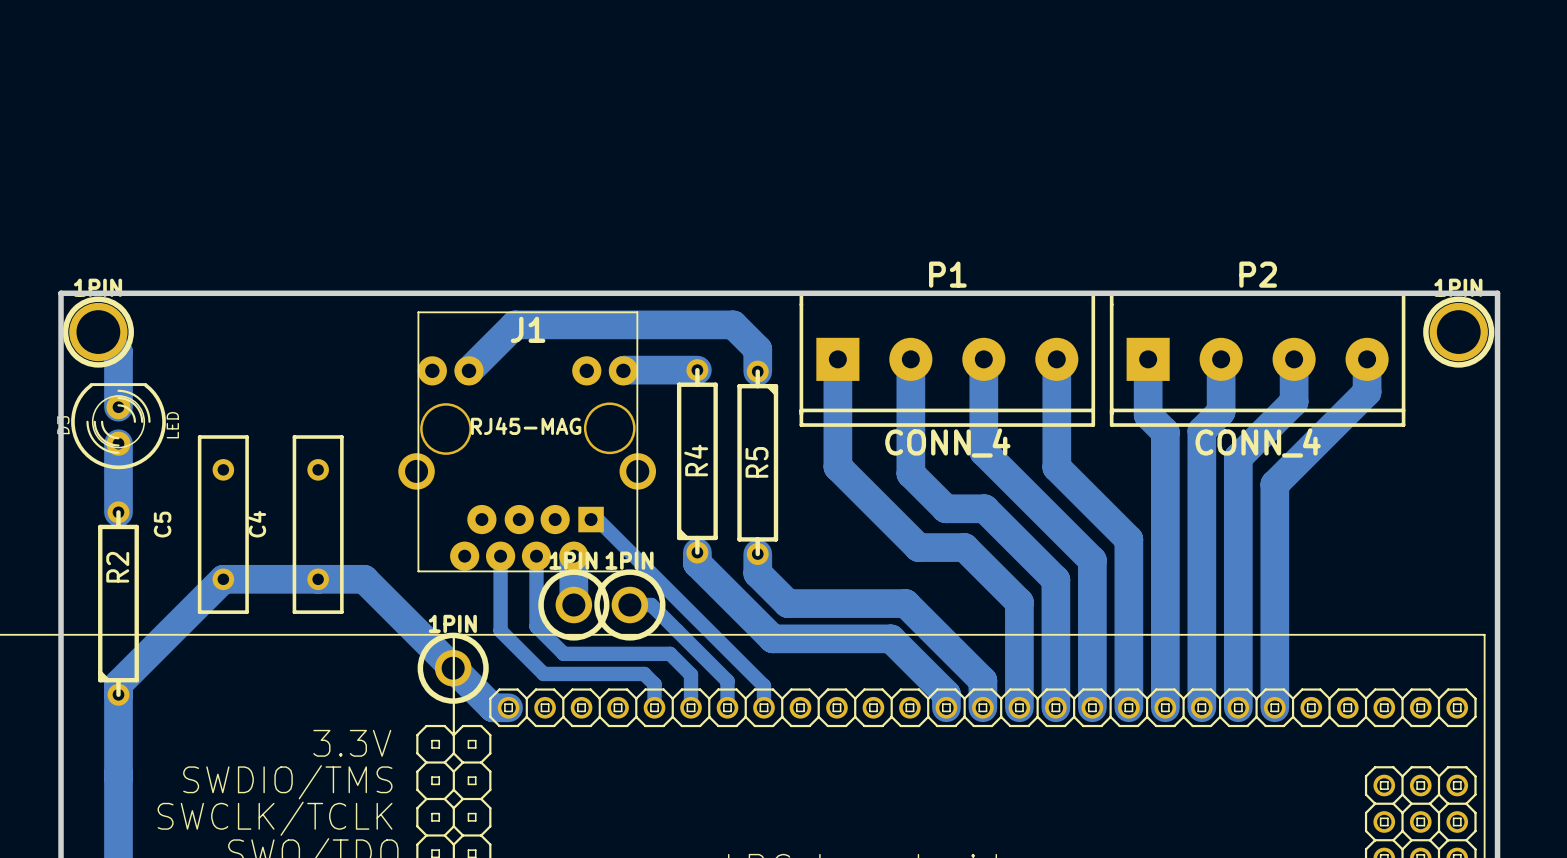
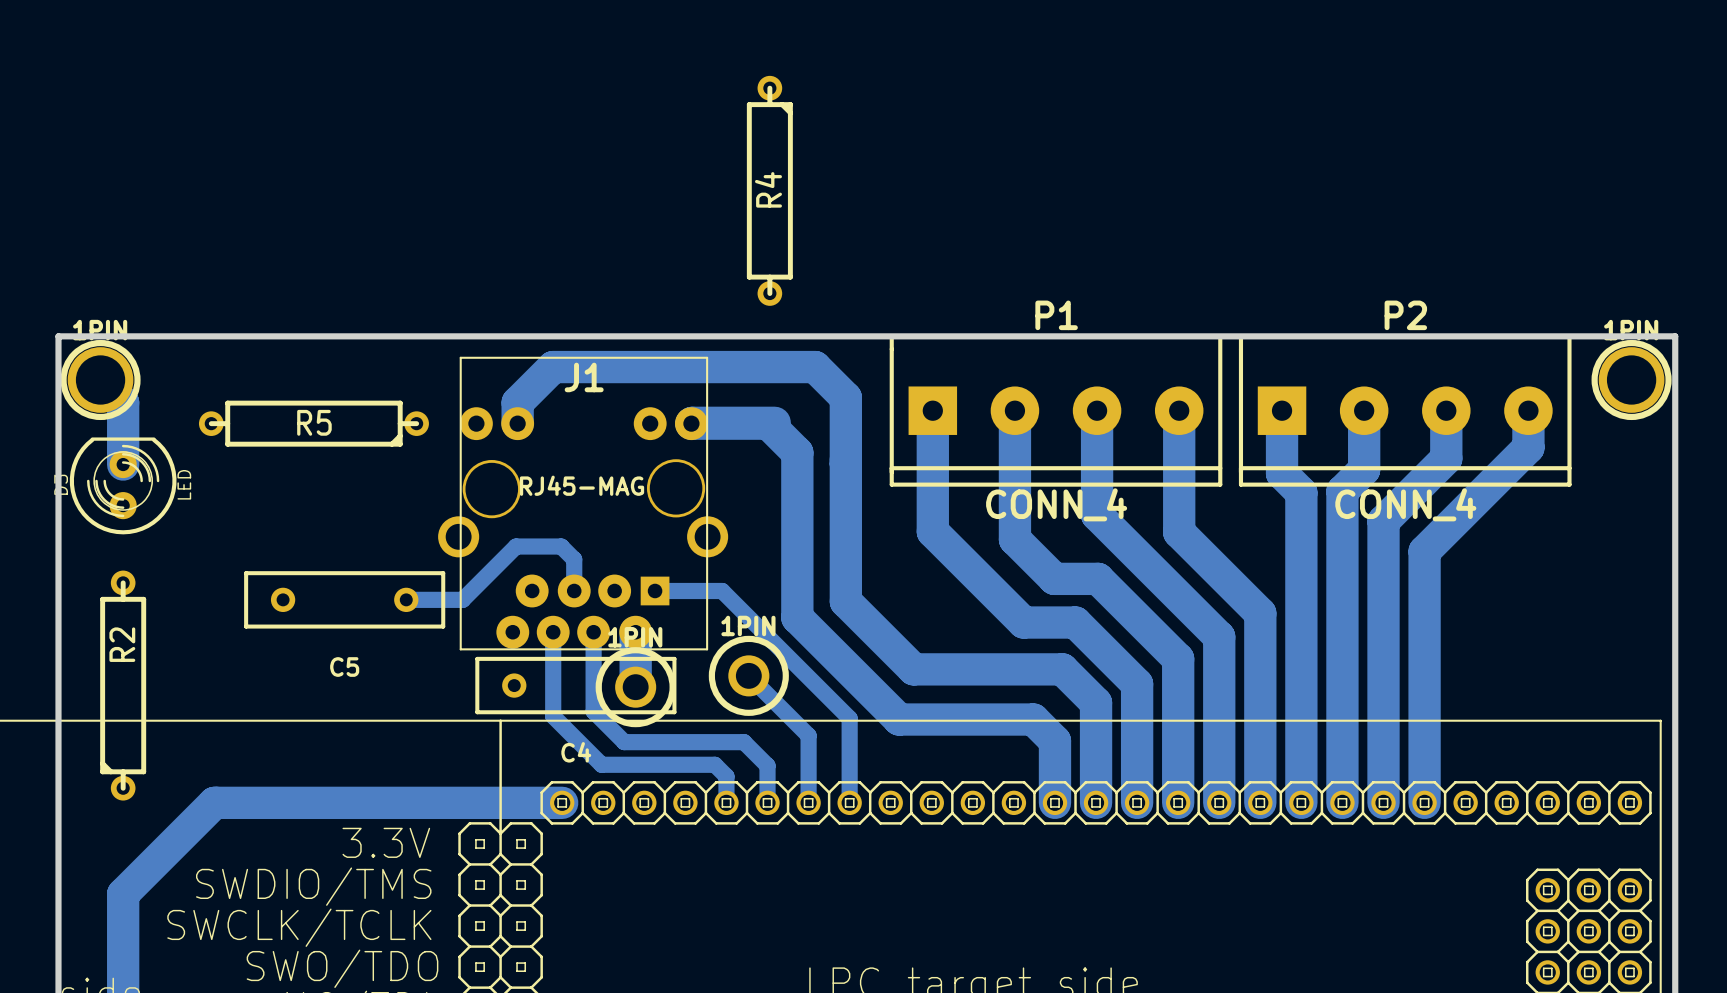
bottom track: (468, 370) (514, 324) (733, 324) (757, 349) (757, 371) -> none
bottom track: (118, 443) (118, 512) -> none
R4 rotation: 0° (697, 461) -> 180° (769, 190)
R4 position: (697, 461) -> (769, 190)
R5 rotation: 0° (757, 462) -> 90° clockwise (313, 423)
R5 position: (757, 462) -> (313, 423)
bottom track: none -> (574, 590) (574, 559) (561, 546) (516, 546) (462, 599) (406, 599)
bottom track: (597, 519) (763, 685) -> (662, 590) (722, 590) (849, 718) (849, 778)
C5 name position: C5 (162, 524) -> C5 (344, 667)
C5 rotation: 0° (223, 524) -> 90° clockwise (344, 599)
C4 name position: C4 (257, 524) -> C4 (576, 752)
C4 rotation: 0° (318, 524) -> 90° clockwise (575, 685)
C4 position: (318, 524) -> (575, 685)
bottom track: (697, 552) (697, 563) (772, 638) (891, 638) (946, 694) -> (691, 423) (768, 423) (797, 452) (797, 617) (899, 719) (1033, 719) (1054, 741) (1054, 787)
bottom track: (757, 554) (757, 573) (787, 603) (905, 603) (982, 680) -> (517, 423) (517, 402) (553, 367) (815, 367) (845, 397) (845, 601) (913, 669) (1062, 669) (1096, 702) (1096, 772)
bottom track: (629, 604) (651, 604) (727, 681) -> (748, 675) (808, 735) (808, 772)
1PIN position: (629, 604) -> (748, 675)
1PIN: (453, 668) -> none
bottom track: (492, 707) (364, 579) (223, 579) (118, 684) (118, 788) -> (544, 802) (214, 802) (123, 894)

